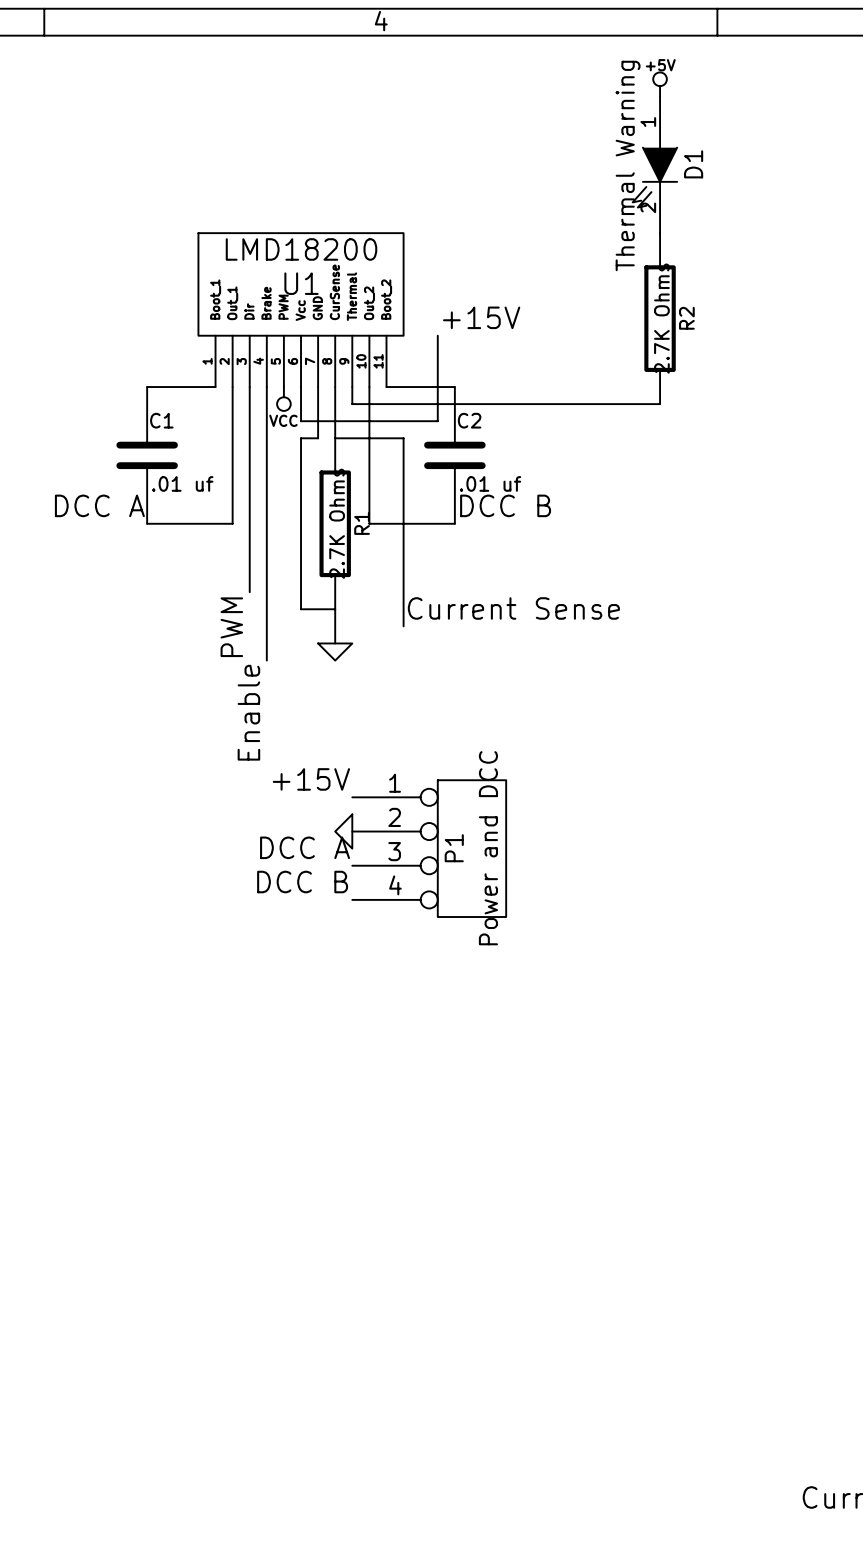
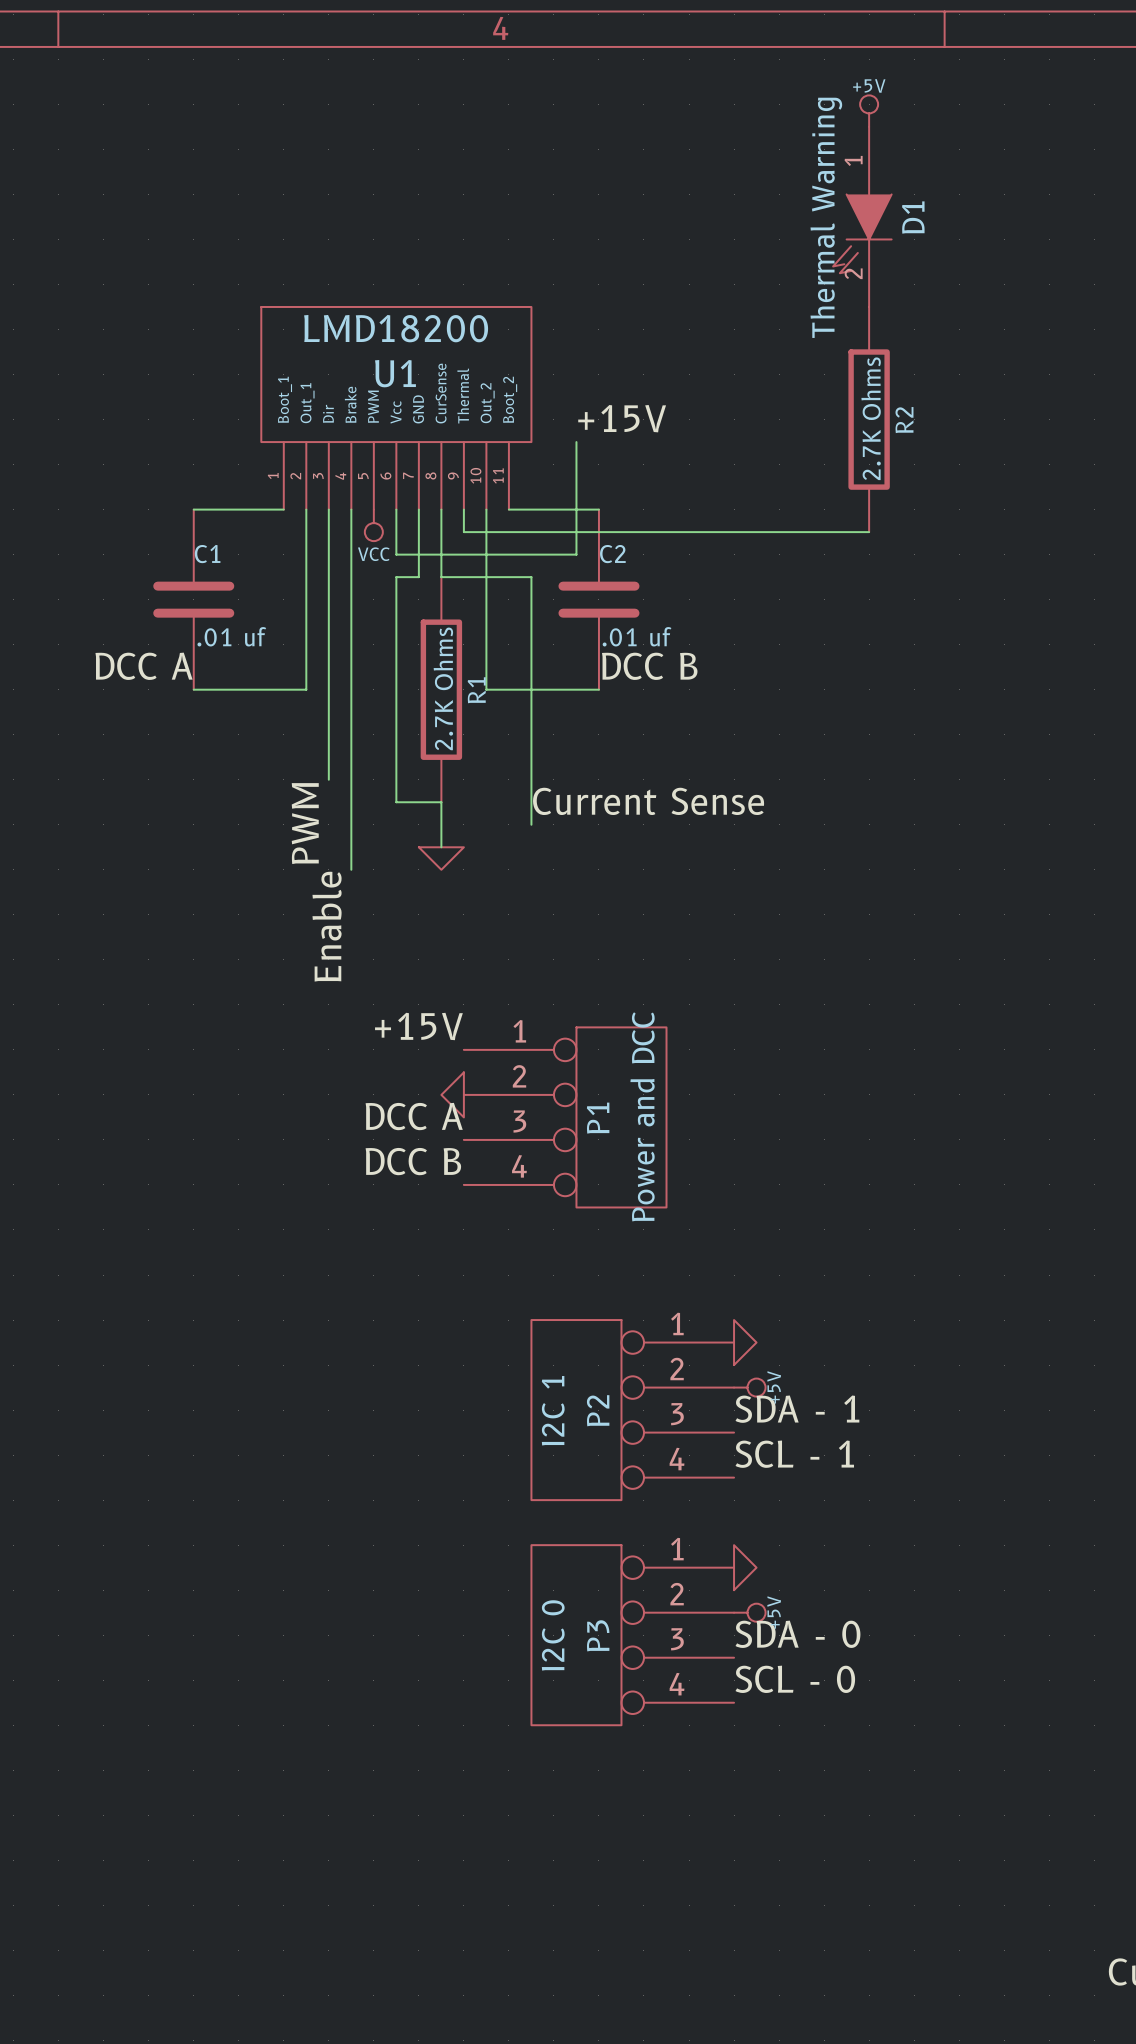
power symbol: none -> (745, 1342)
power symbol: none -> +5V (749, 1387)
P2: none -> I2C 1 (632, 1410)
label: none -> SDA - 1 (797, 1409)
label: none -> SCL - 1 (794, 1454)
power symbol: none -> (745, 1567)
power symbol: none -> +5V (749, 1612)
P3: none -> I2C 0 (632, 1635)
label: none -> SDA - 0 (797, 1634)
label: none -> SCL - 0 (795, 1679)

